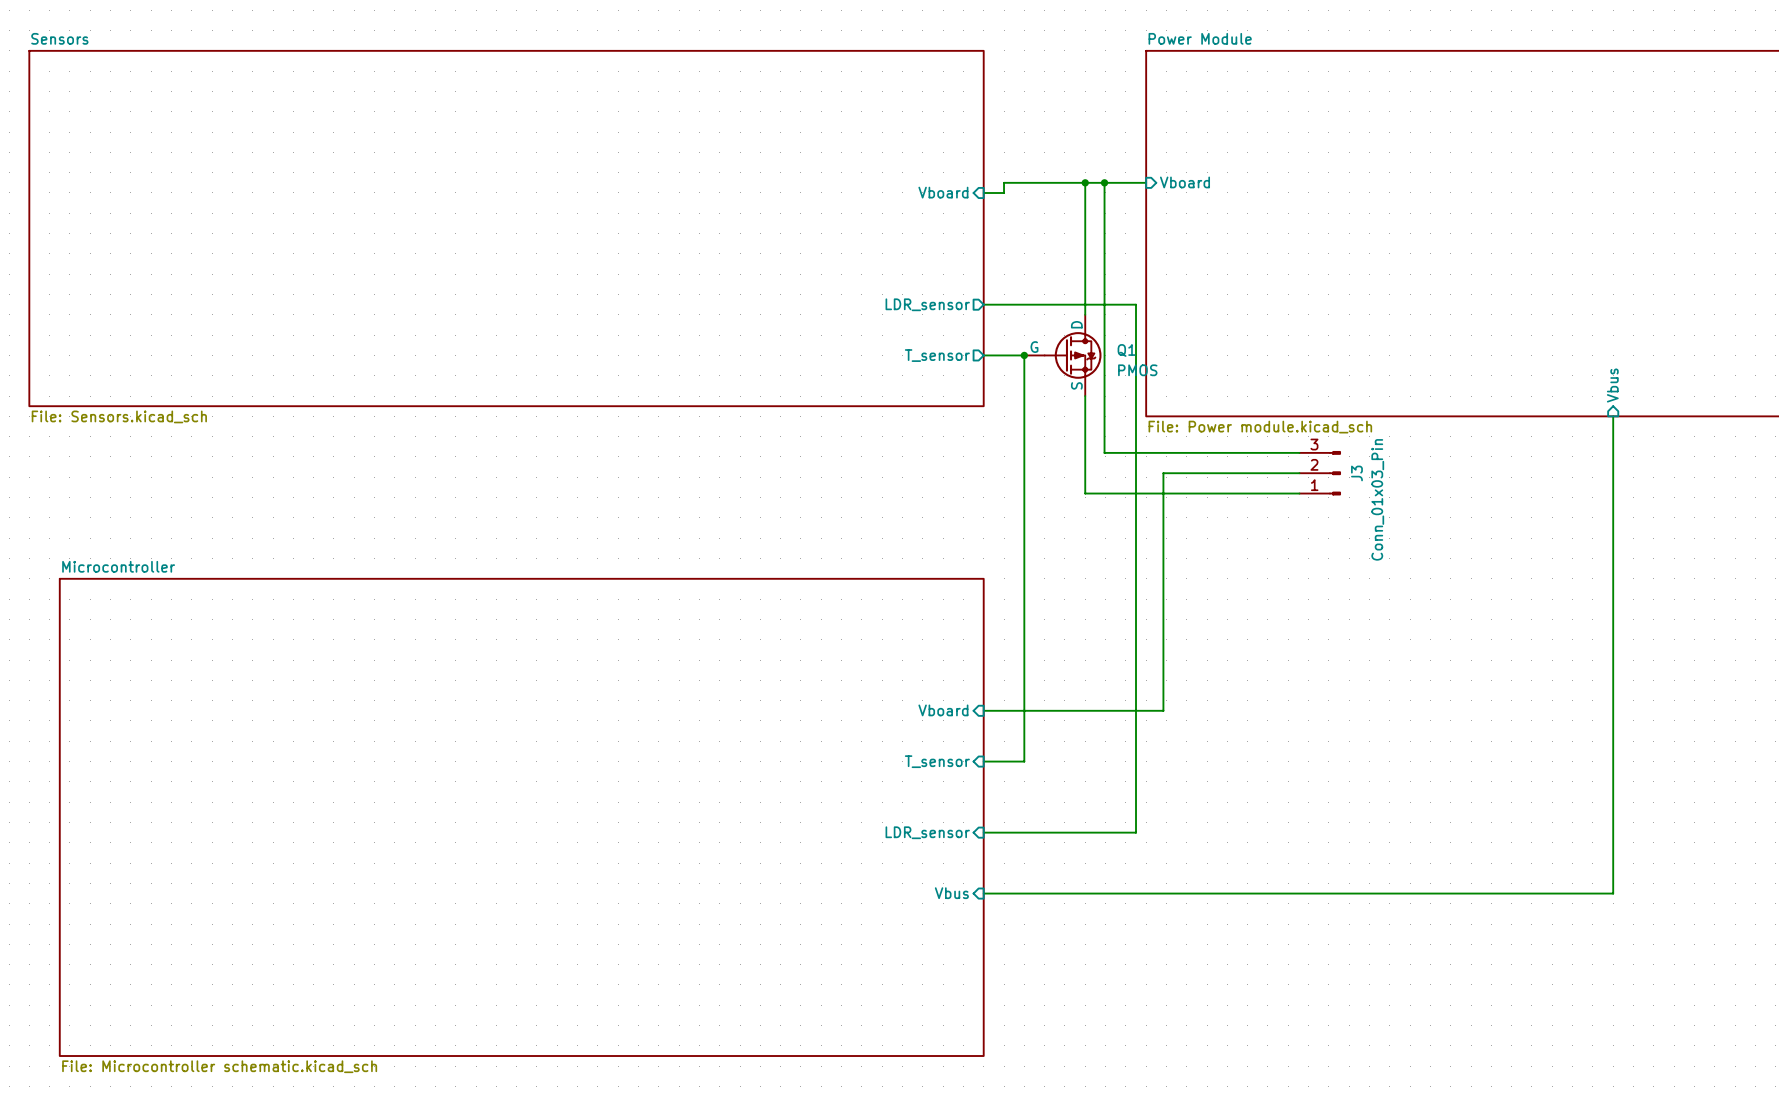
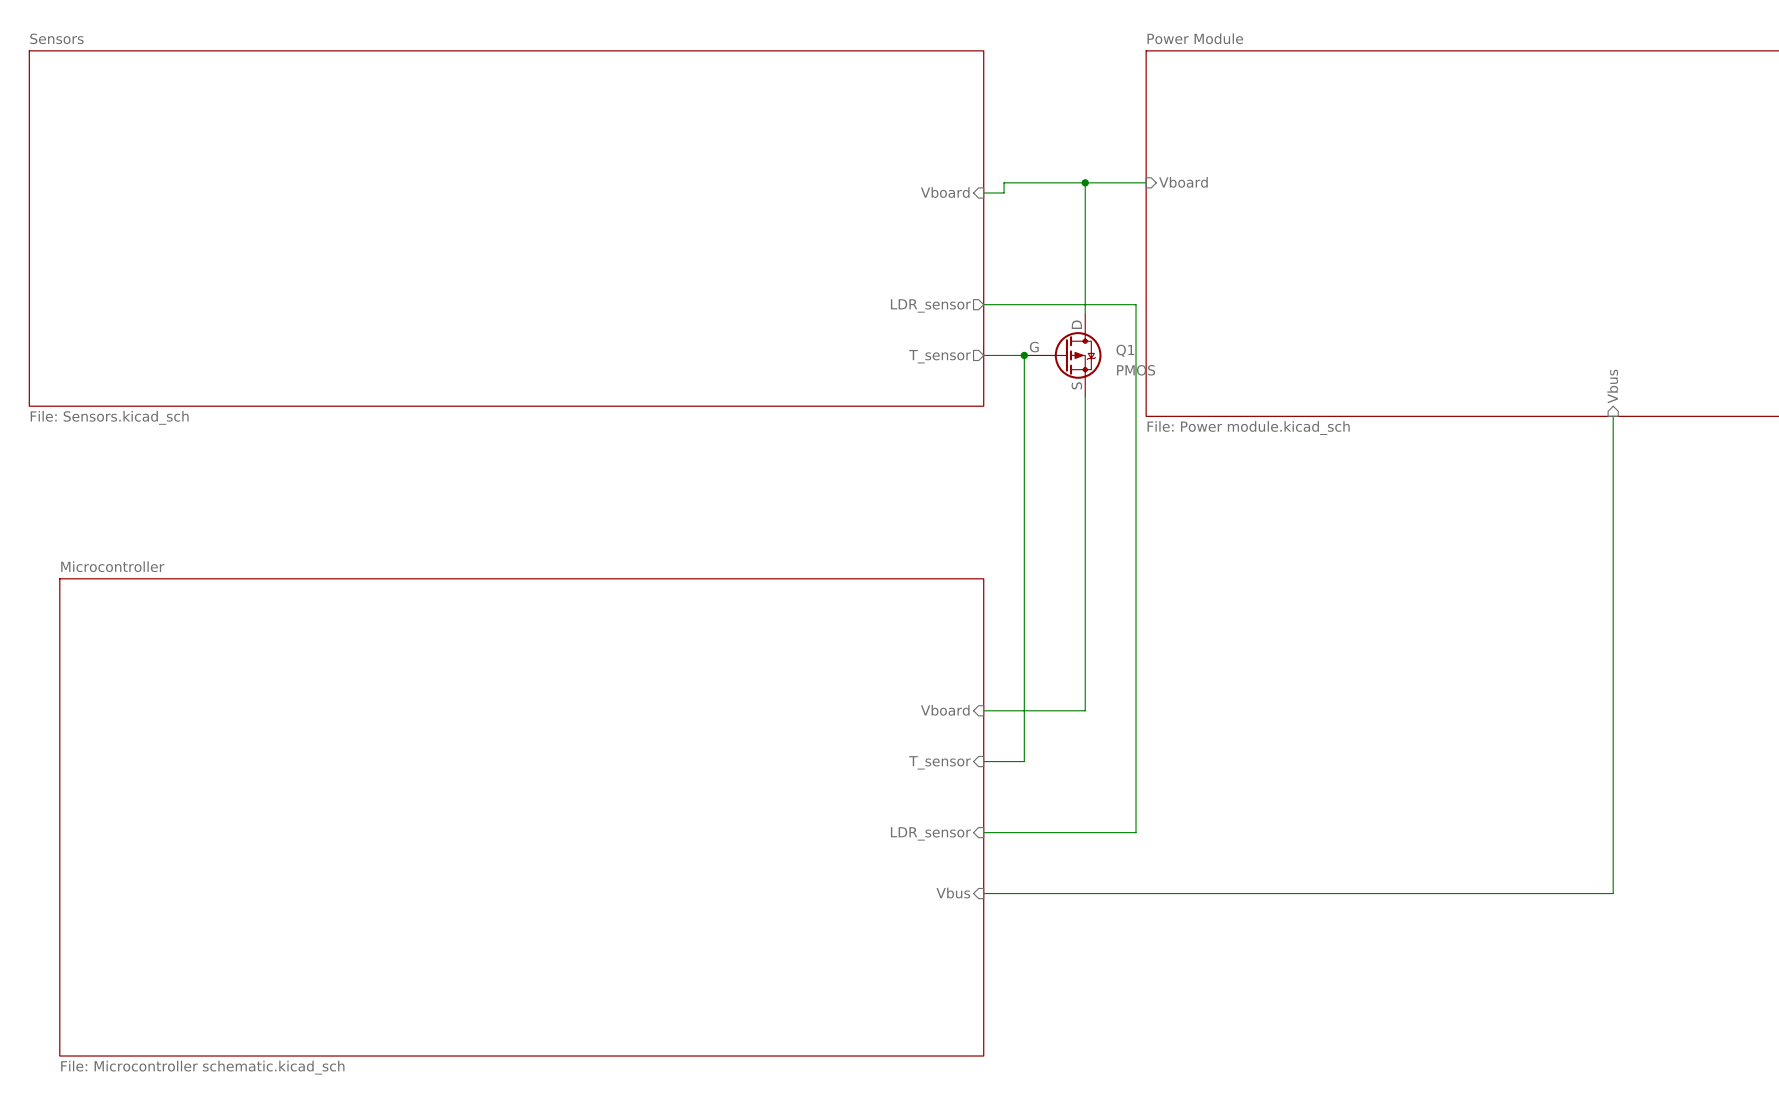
wire: (1104, 182) (1104, 452) (1299, 452) -> none
junction: (1104, 182) -> none
wire: (1299, 473) (1163, 473) (1163, 710) (1085, 710) -> (1085, 493) (1085, 710)
J3: Conn_01x03_Pin (1320, 473) -> none
wire: (1085, 493) (1299, 493) -> none

